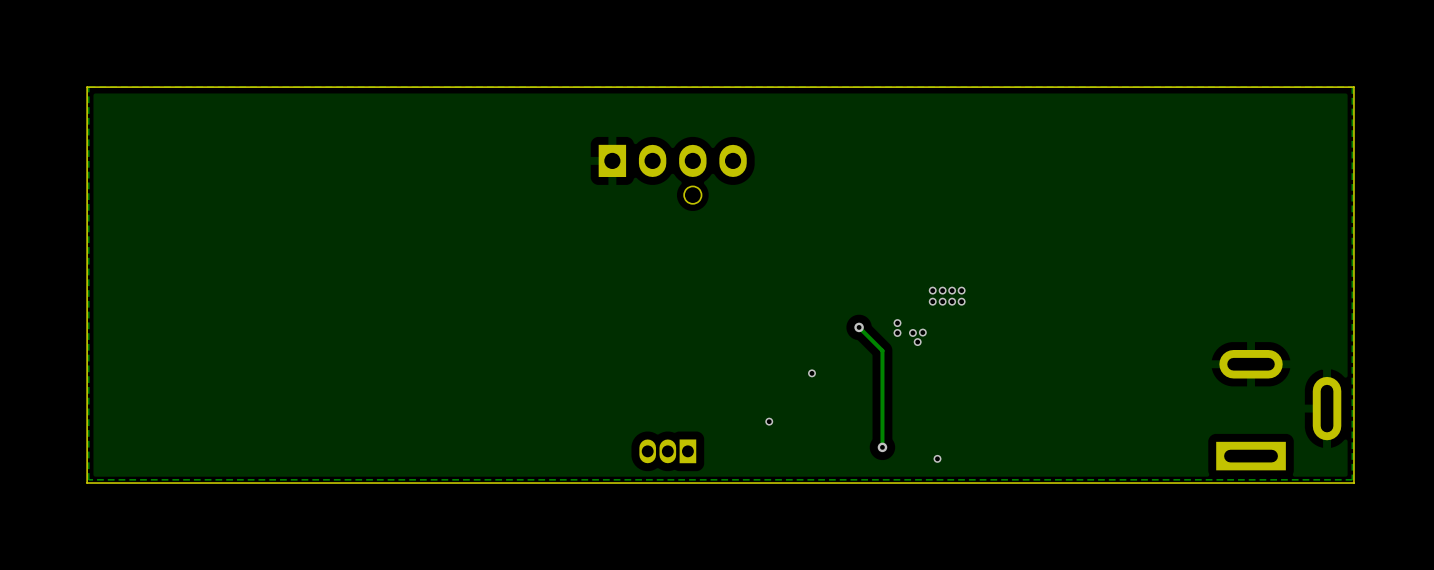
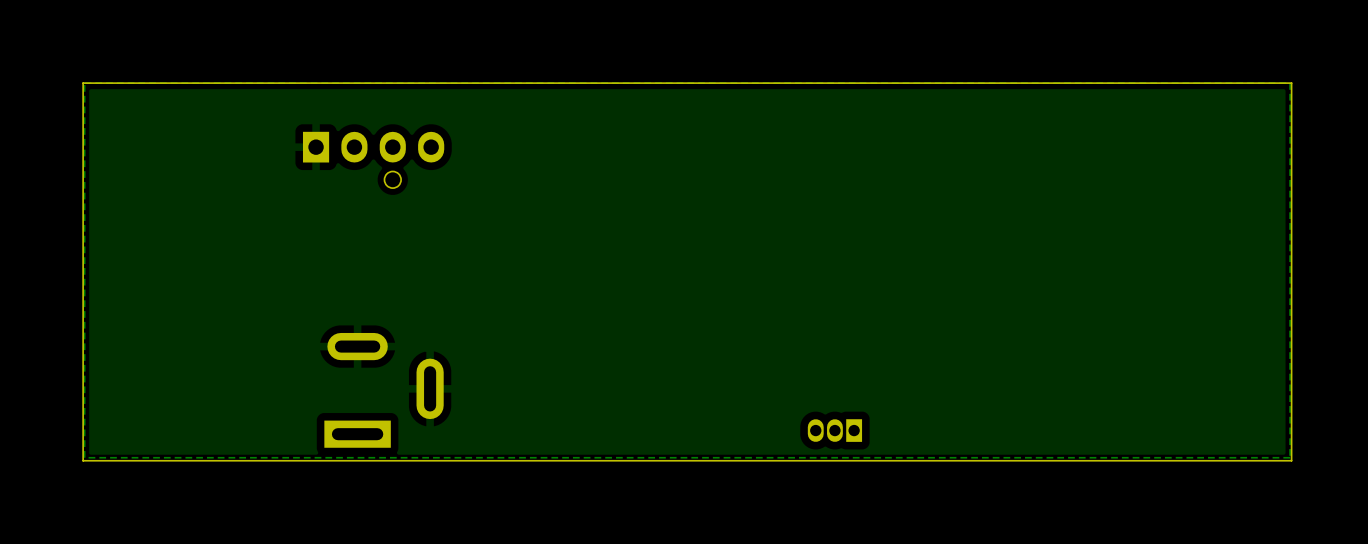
part position: (672, 174) -> (373, 159)
via: (932, 290) -> none
via: (942, 290) -> none
via: (952, 290) -> none
via: (961, 290) -> none
via: (932, 301) -> none
via: (942, 301) -> none
via: (952, 301) -> none
via: (961, 301) -> none
via: (897, 323) -> none
track: (859, 327) (882, 350) (882, 447) -> none
via: (859, 327) -> none
via: (897, 332) -> none
via: (912, 332) -> none
via: (922, 332) -> none
via: (917, 342) -> none
via: (811, 373) -> none
part: none -> (384, 390)
part: (1278, 410) -> none
via: (769, 421) -> none
via: (882, 447) -> none
part position: (667, 451) -> (834, 430)
via: (937, 458) -> none

